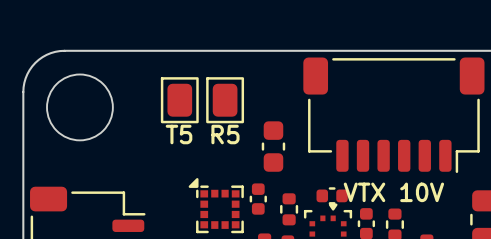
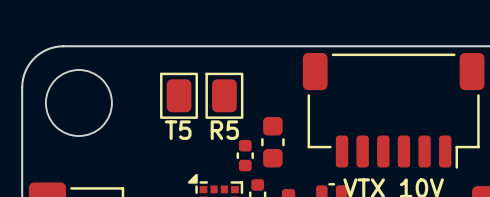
part: none -> (245, 155)

